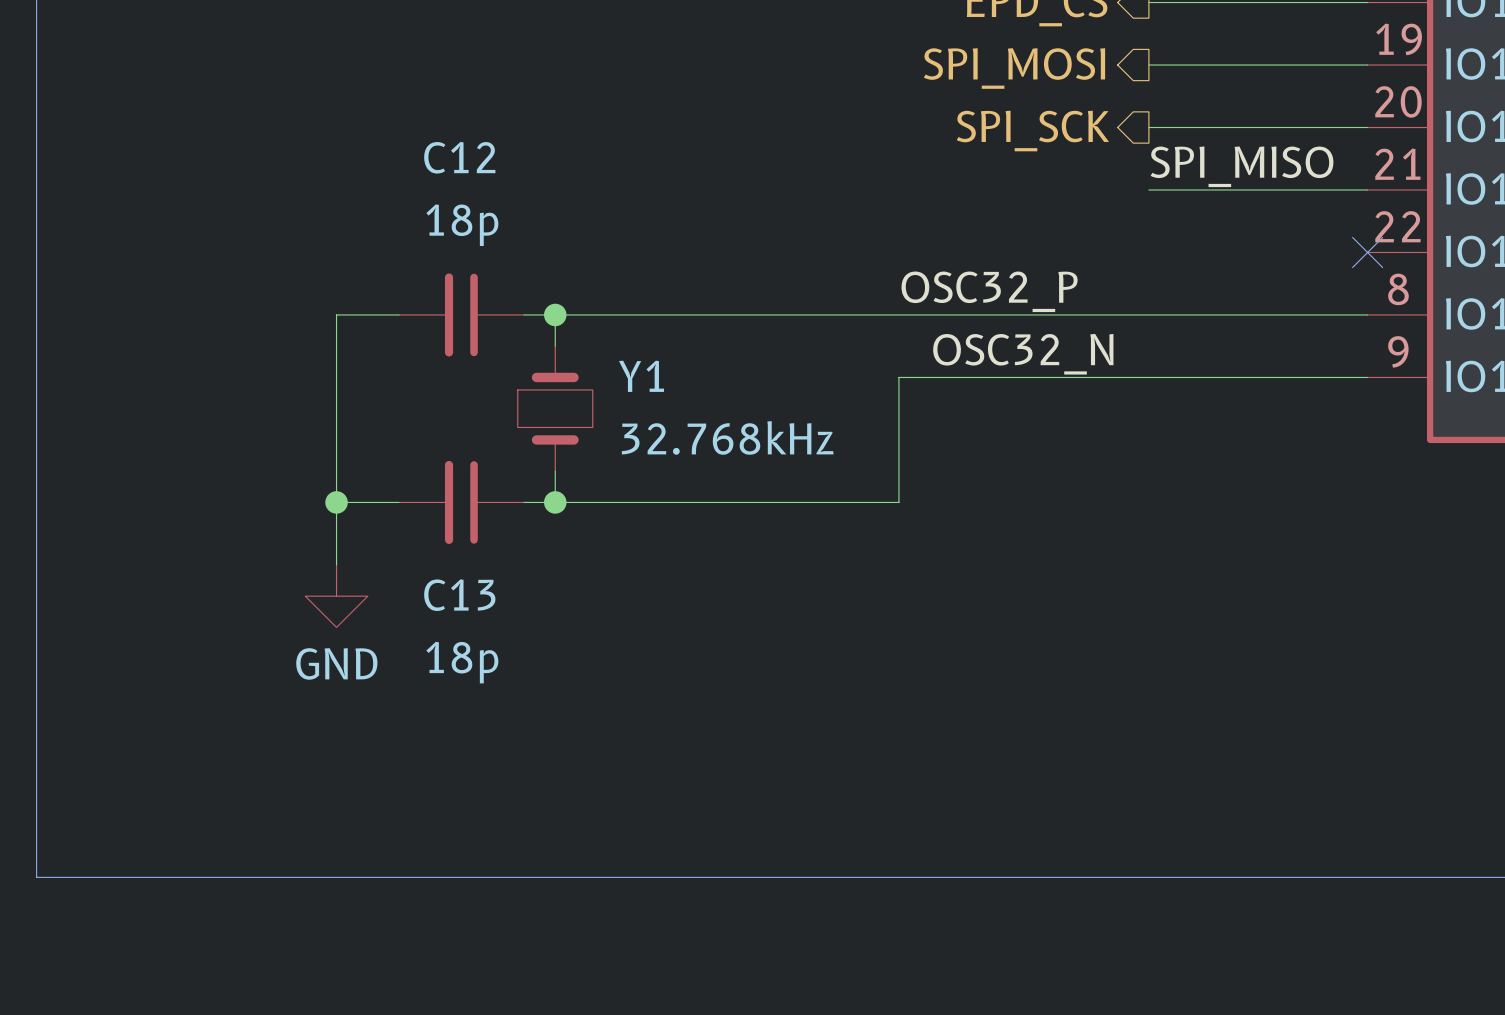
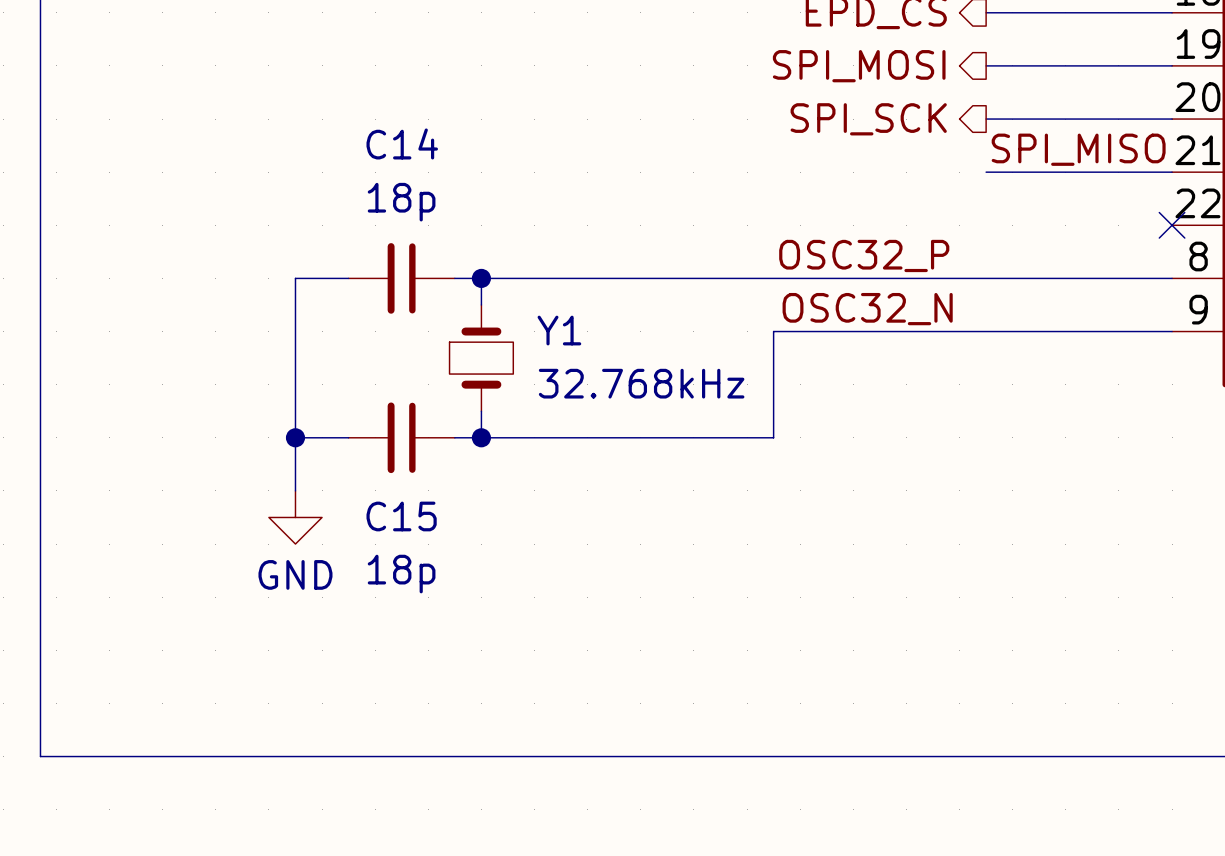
C12 name: C12 (459, 157) -> C14 (402, 143)
C13 name: C13 (459, 595) -> C15 (401, 516)

